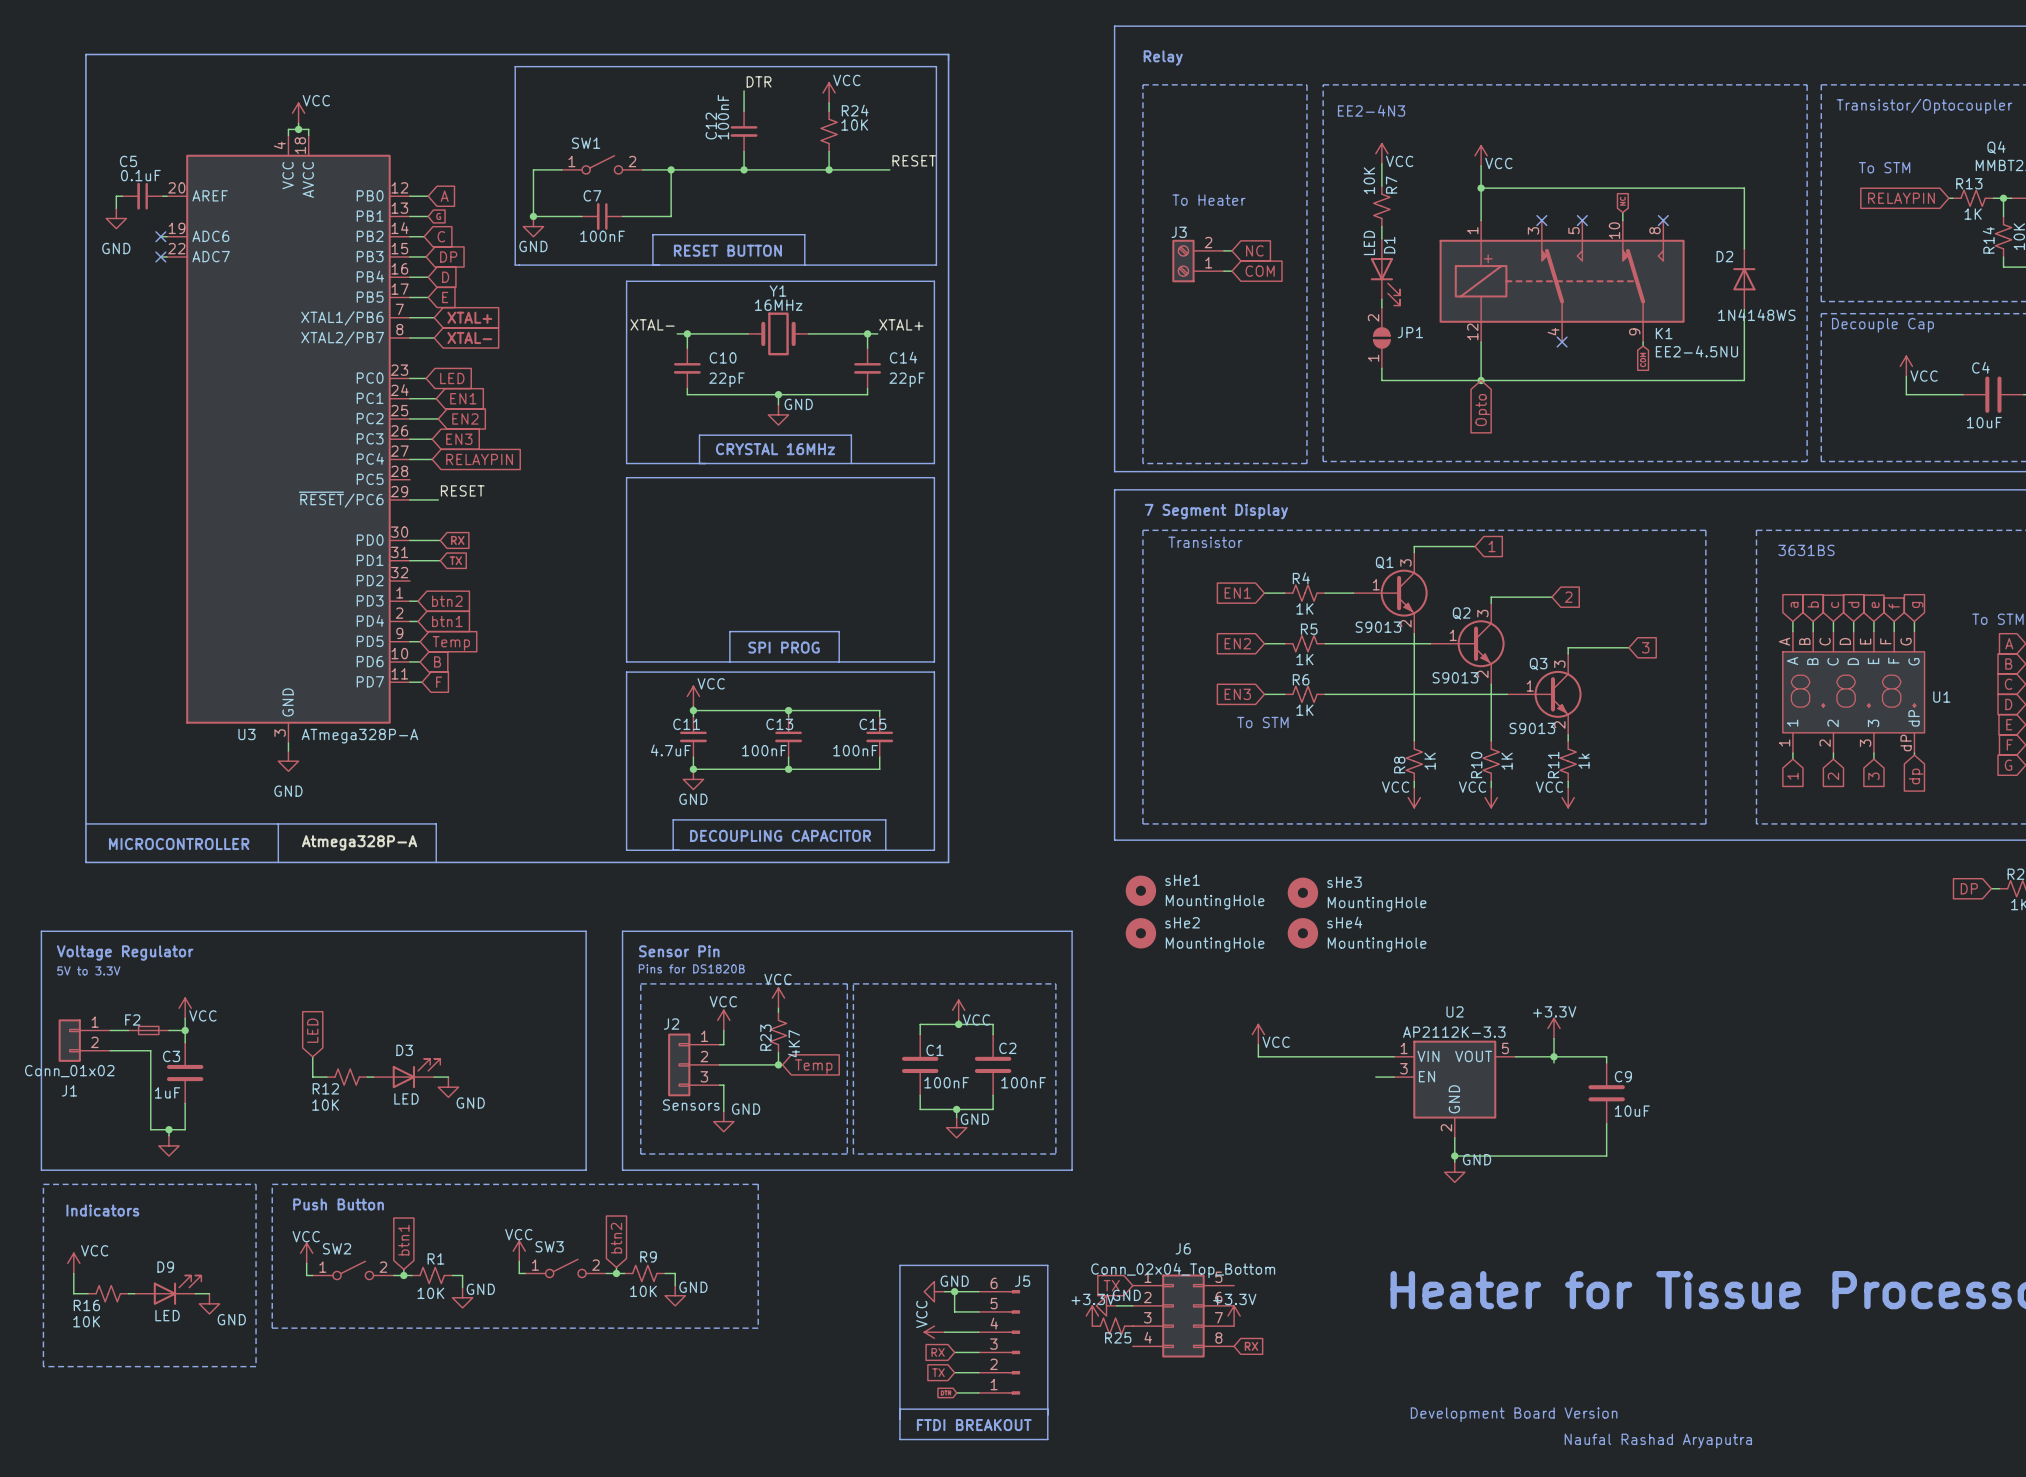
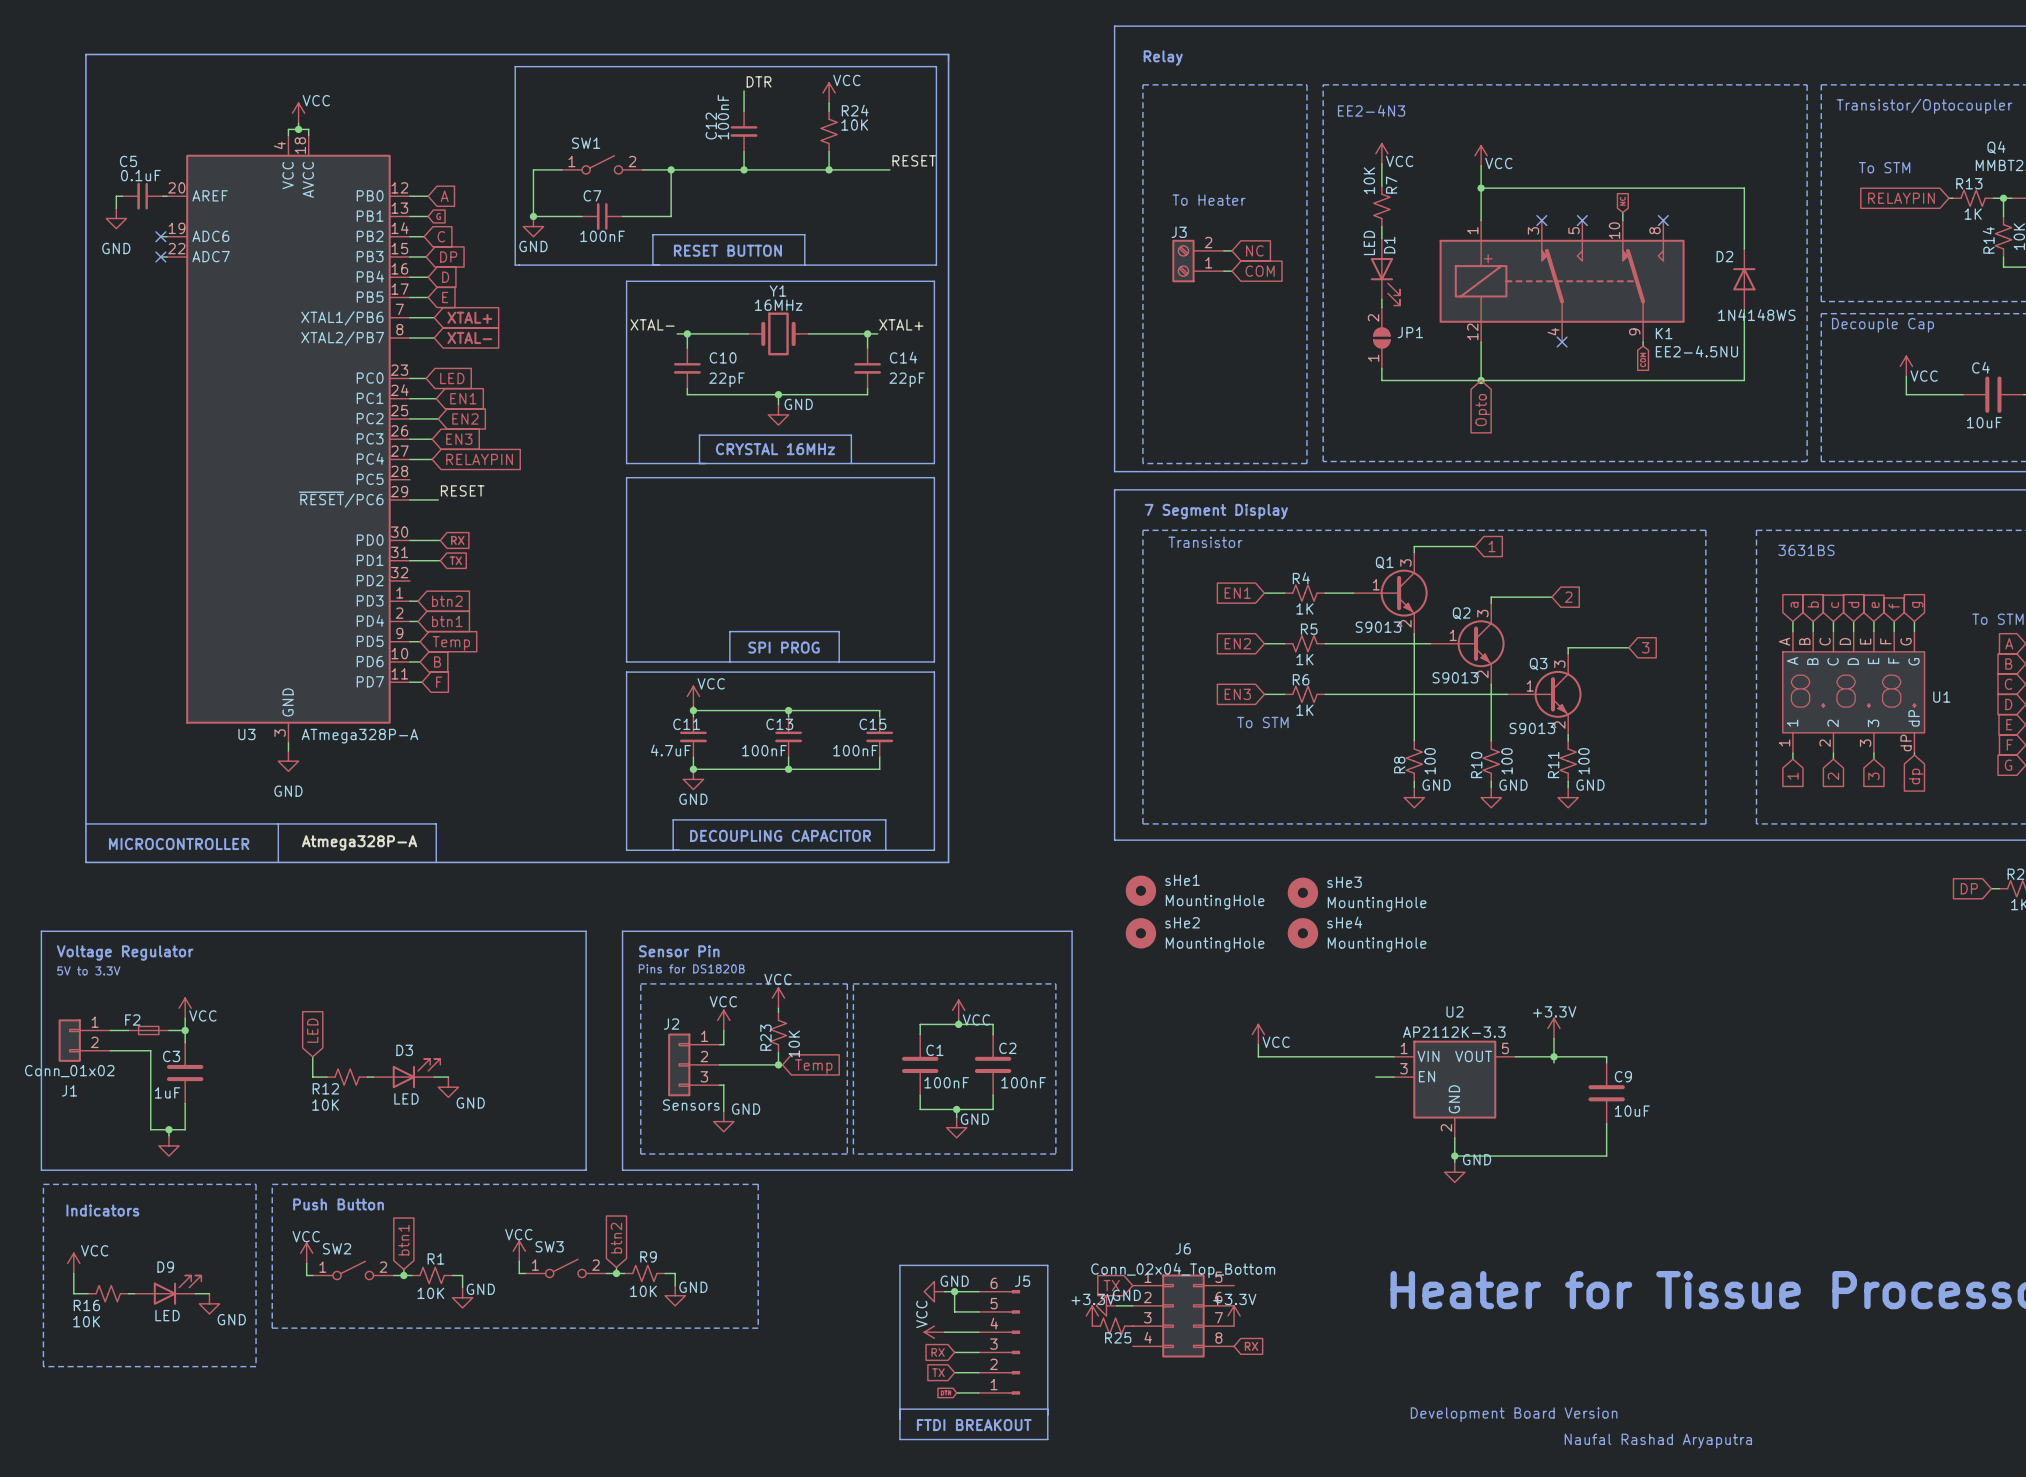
R8 value: 1K (1430, 761) -> 100 (1430, 761)
R10 value: 1K (1507, 761) -> 100 (1507, 761)
R11 value: 1k (1583, 761) -> 100 (1583, 761)
power symbol: VCC (1414, 797) -> GND (1414, 797)
power symbol: VCC (1491, 797) -> GND (1491, 797)
power symbol: VCC (1568, 797) -> GND (1568, 797)
R23 value: 4K7 (794, 1043) -> 10K (794, 1043)

